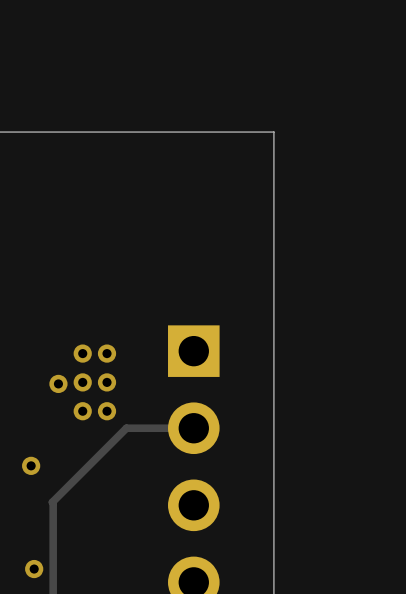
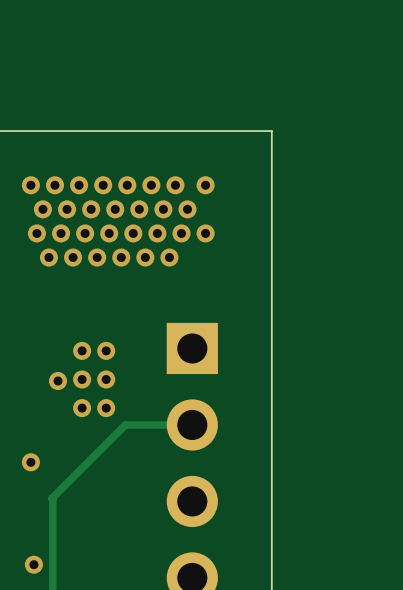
via: none -> (30, 185)
via: none -> (54, 185)
via: none -> (79, 185)
via: none -> (103, 185)
via: none -> (127, 185)
via: none -> (151, 185)
via: none -> (175, 185)
via: none -> (205, 185)
via: none -> (42, 209)
via: none -> (67, 209)
via: none -> (91, 209)
via: none -> (115, 209)
via: none -> (139, 209)
via: none -> (163, 209)
via: none -> (187, 209)
via: none -> (36, 233)
via: none -> (61, 233)
via: none -> (85, 233)
via: none -> (109, 233)
via: none -> (133, 233)
via: none -> (157, 233)
via: none -> (181, 233)
via: none -> (205, 233)
via: none -> (48, 257)
via: none -> (73, 257)
via: none -> (97, 257)
via: none -> (121, 257)
via: none -> (145, 257)
via: none -> (169, 257)

